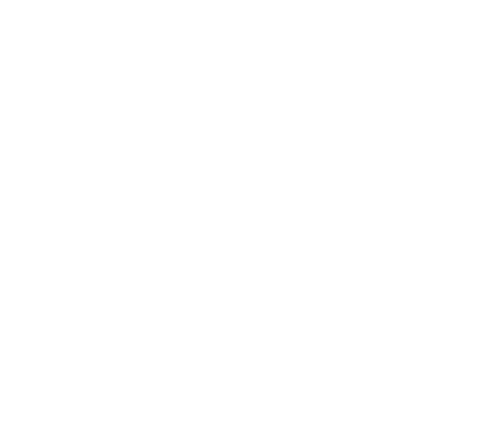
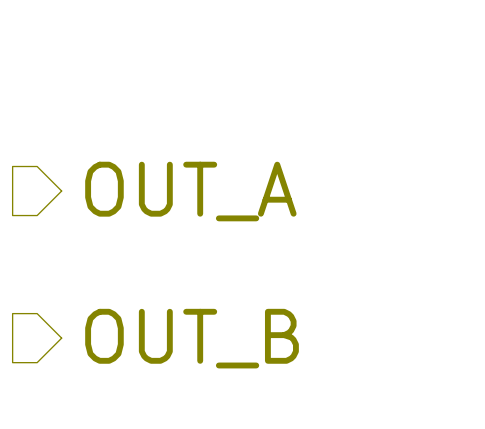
hierarchical label: none -> OUT_A (190, 191)
hierarchical label: none -> OUT_B (192, 338)

